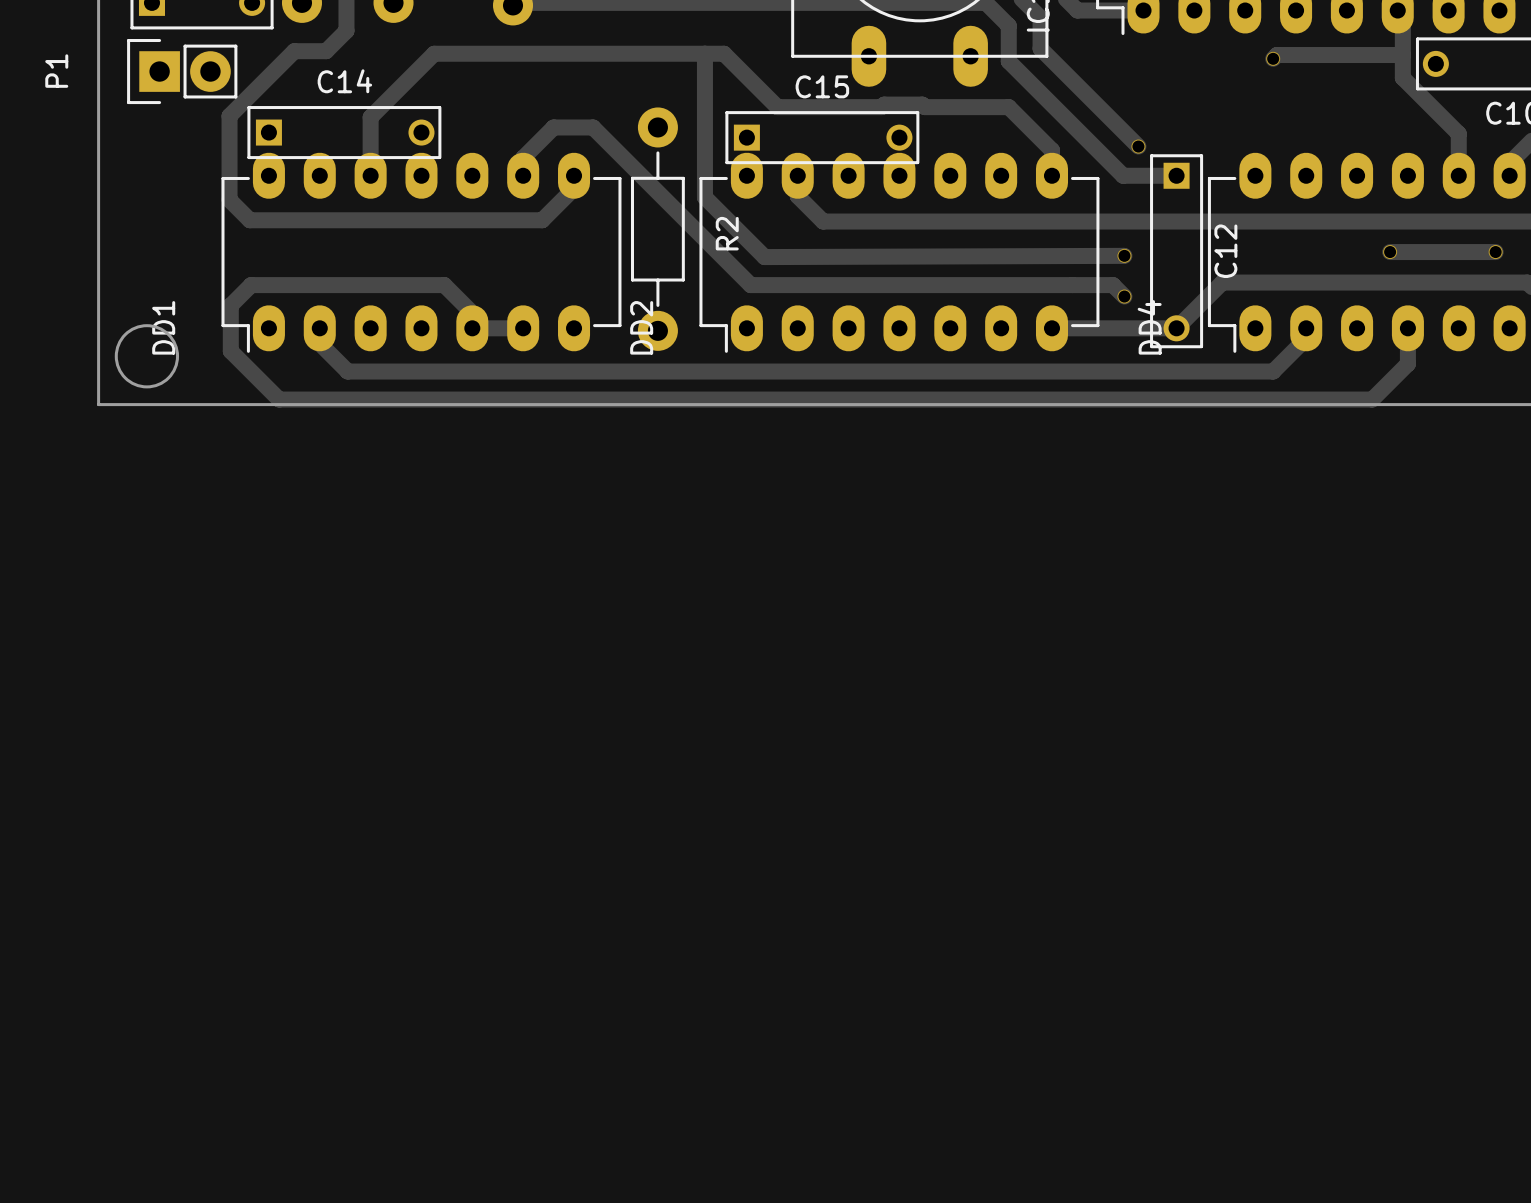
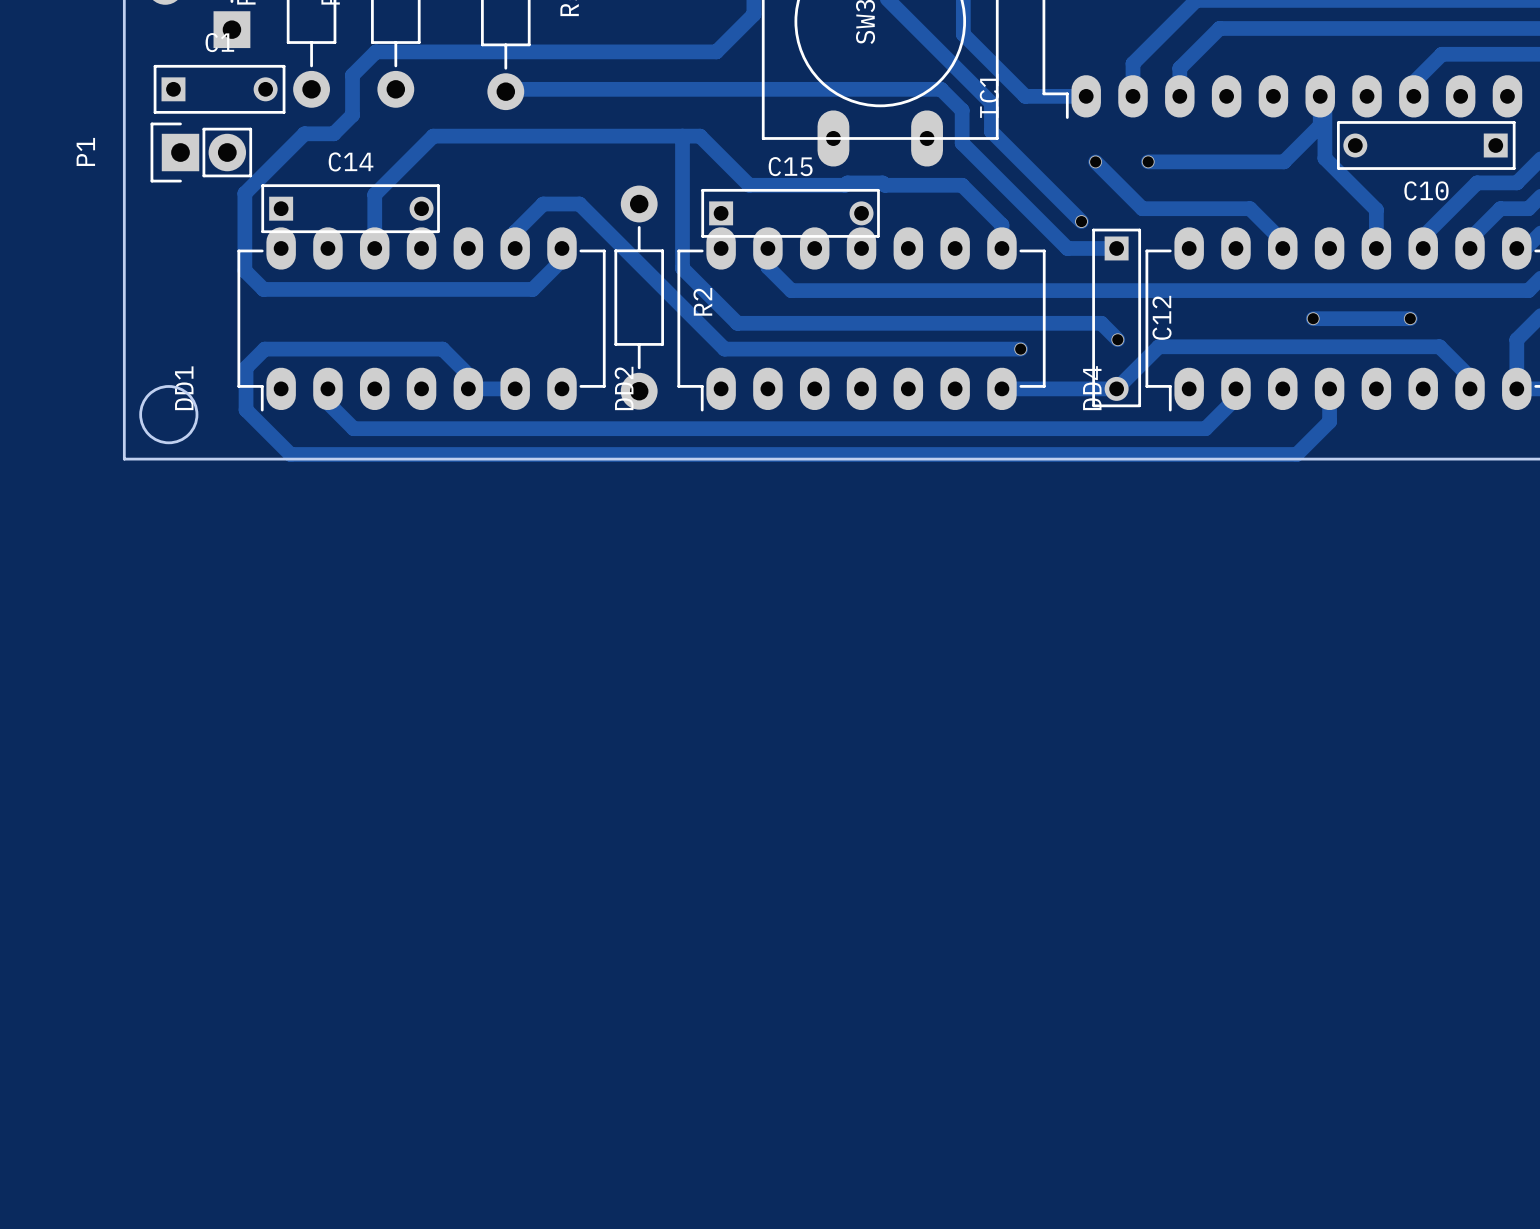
track: none -> (1320, 105) (1320, 125) (1283, 161) (1148, 161)
track: (1402, 55) (1276, 55) (1273, 58) -> none
via: (1273, 58) -> none
track: none -> (1095, 161) (1142, 208) (1250, 208) (1282, 241)
via: none -> (1095, 161)
via: none -> (1148, 161)
track: (1124, 255) (764, 257) -> (1117, 339) (1101, 323) (737, 323)
via: (1124, 255) -> none
via: none -> (1117, 339)
track: (1072, 285) (1113, 285) (1124, 296) -> none
via: none -> (1020, 349)
via: (1124, 296) -> none

